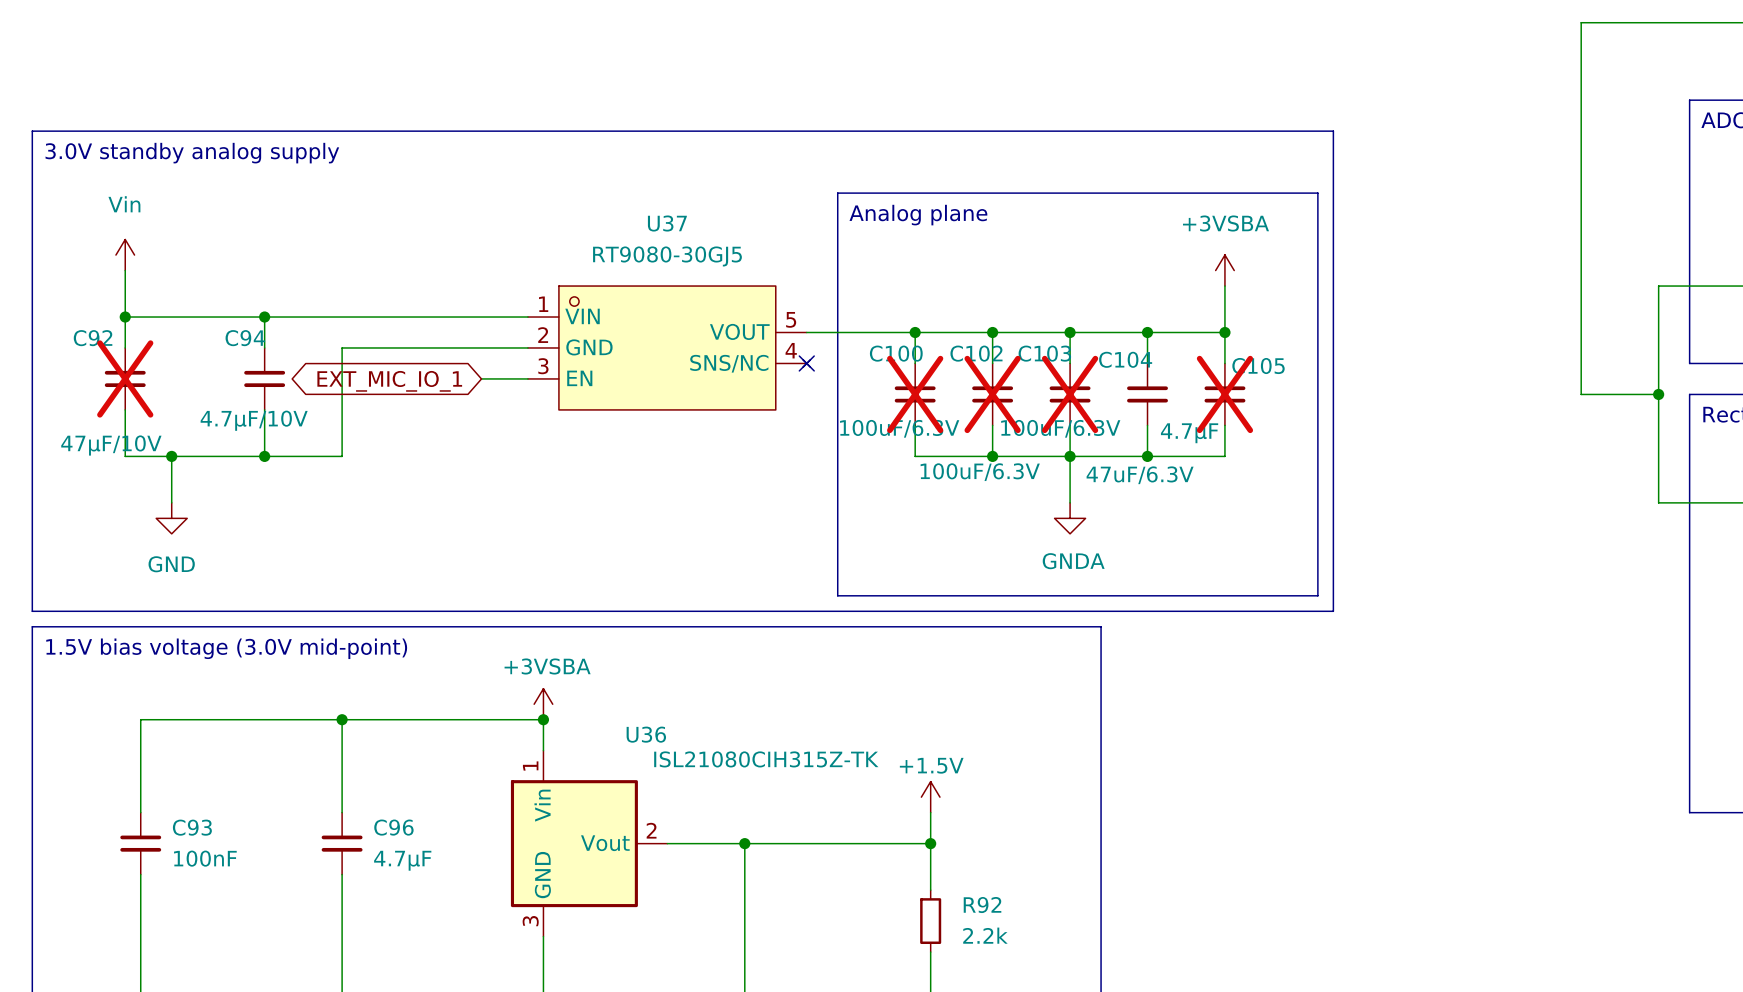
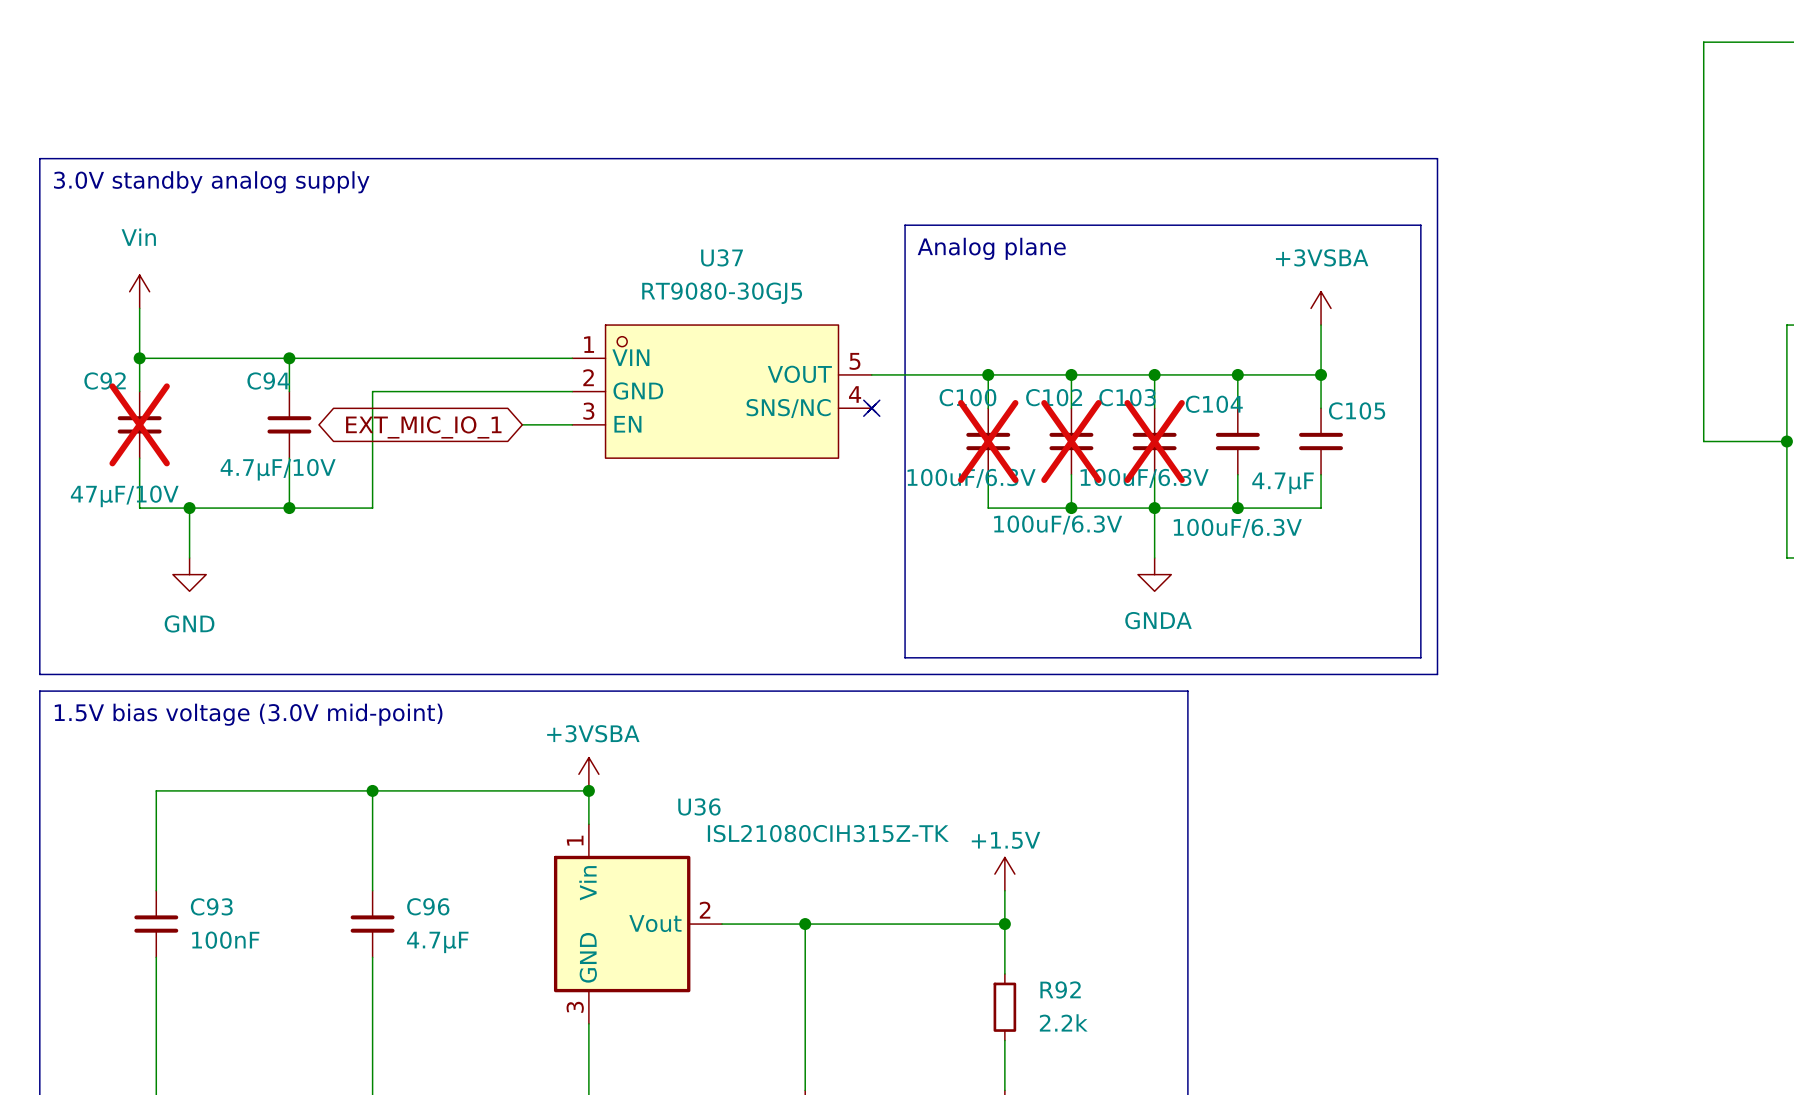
C105 do-not-place cross: (1224, 394) -> none
C104 value: 47uF/6.3V (1140, 475) -> 100uF/6.3V (1237, 528)

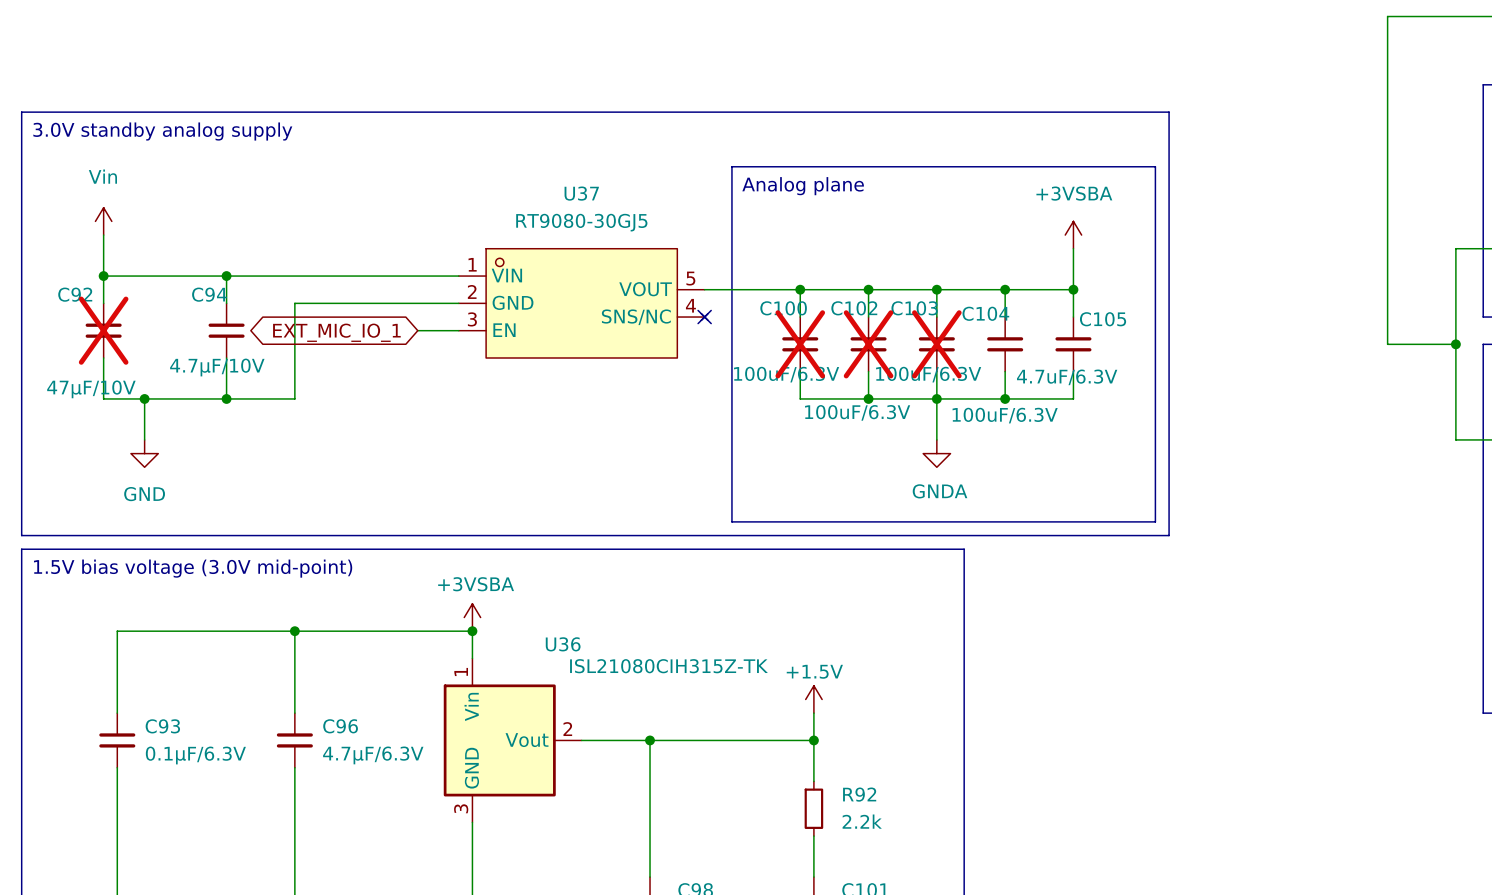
C105 value: 4.7µF (1283, 483) -> 4.7uF/6.3V (1067, 377)
C93 value: 100nF (225, 940) -> 0.1µF/6.3V (195, 755)
C96 value: 4.7µF (437, 942) -> 4.7µF/6.3V (373, 755)

